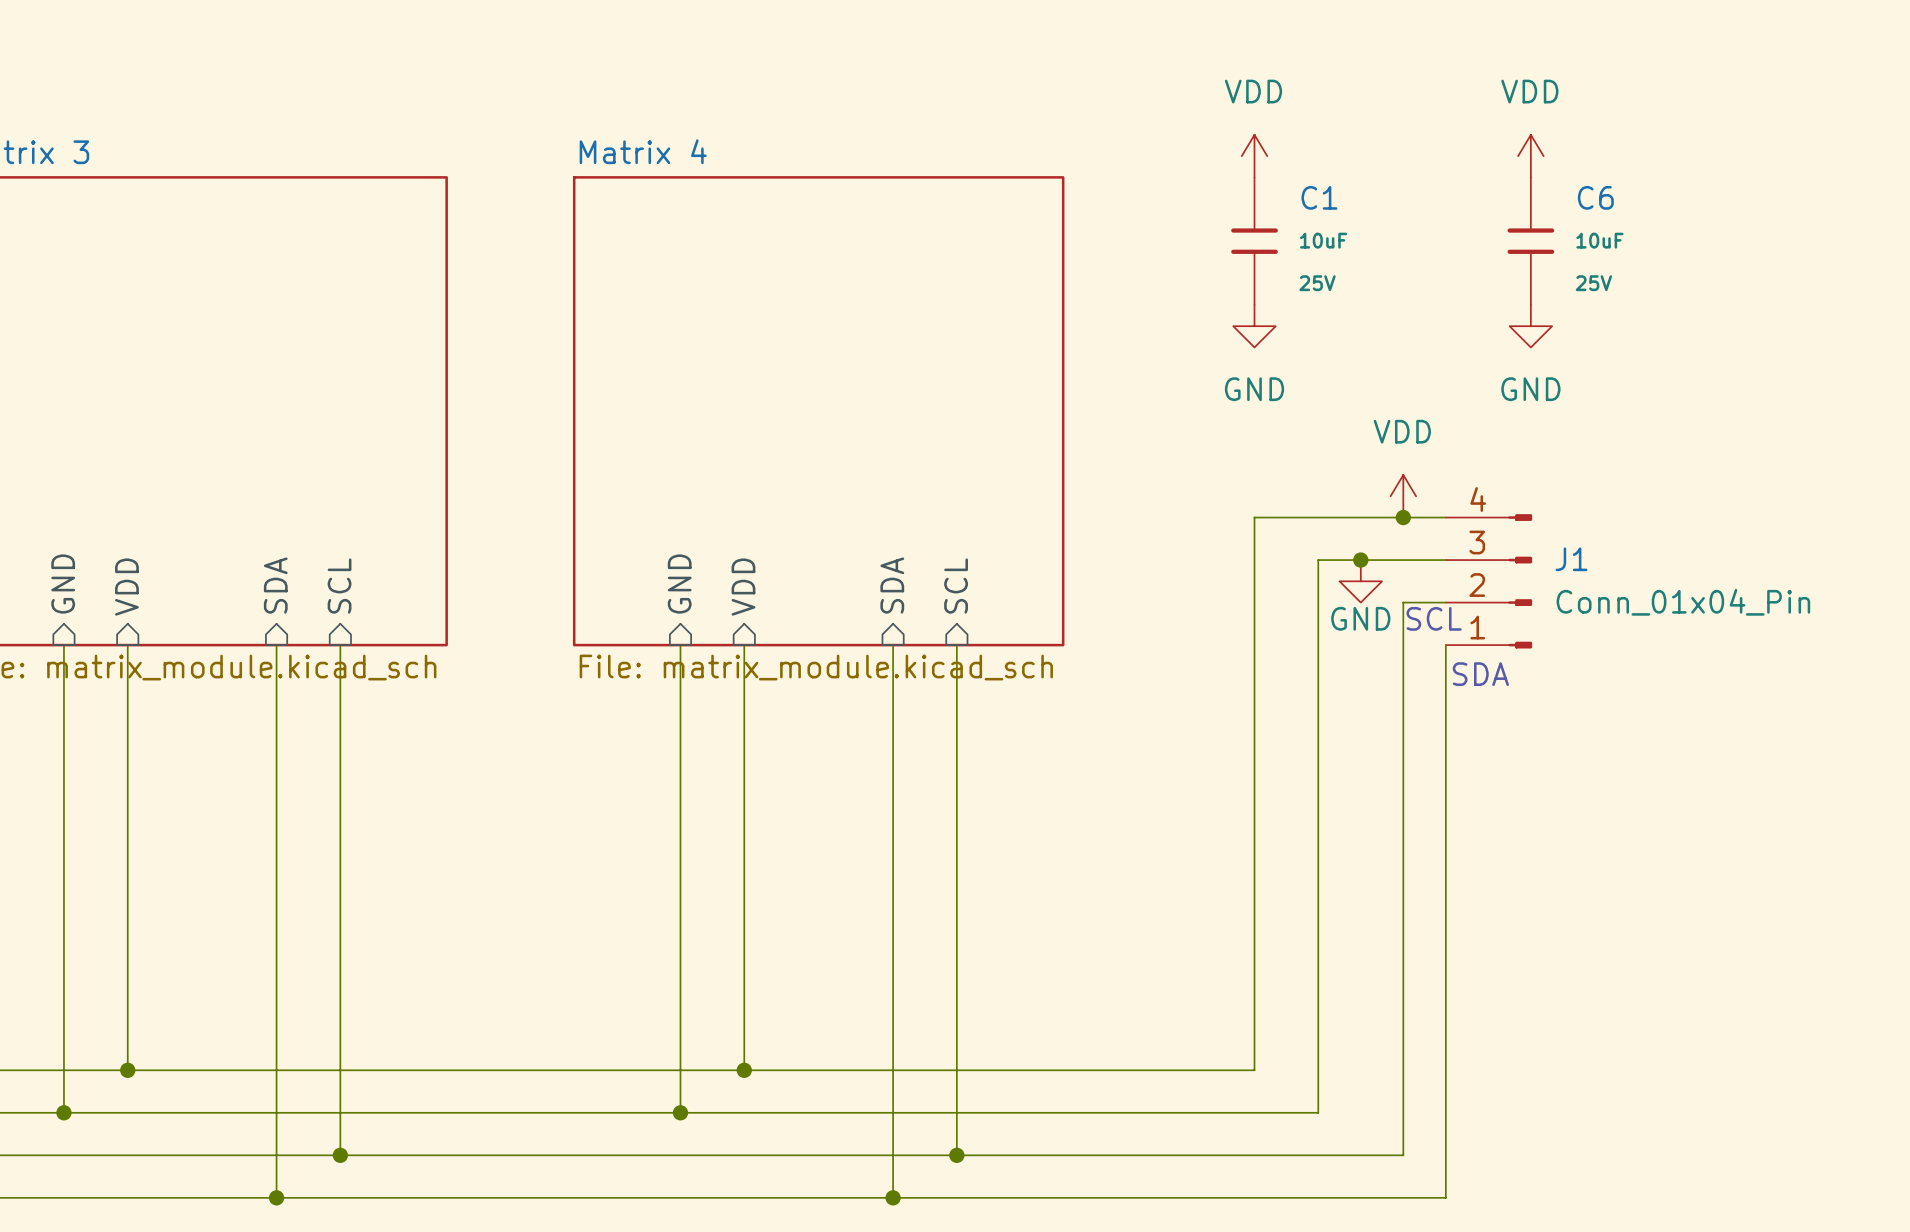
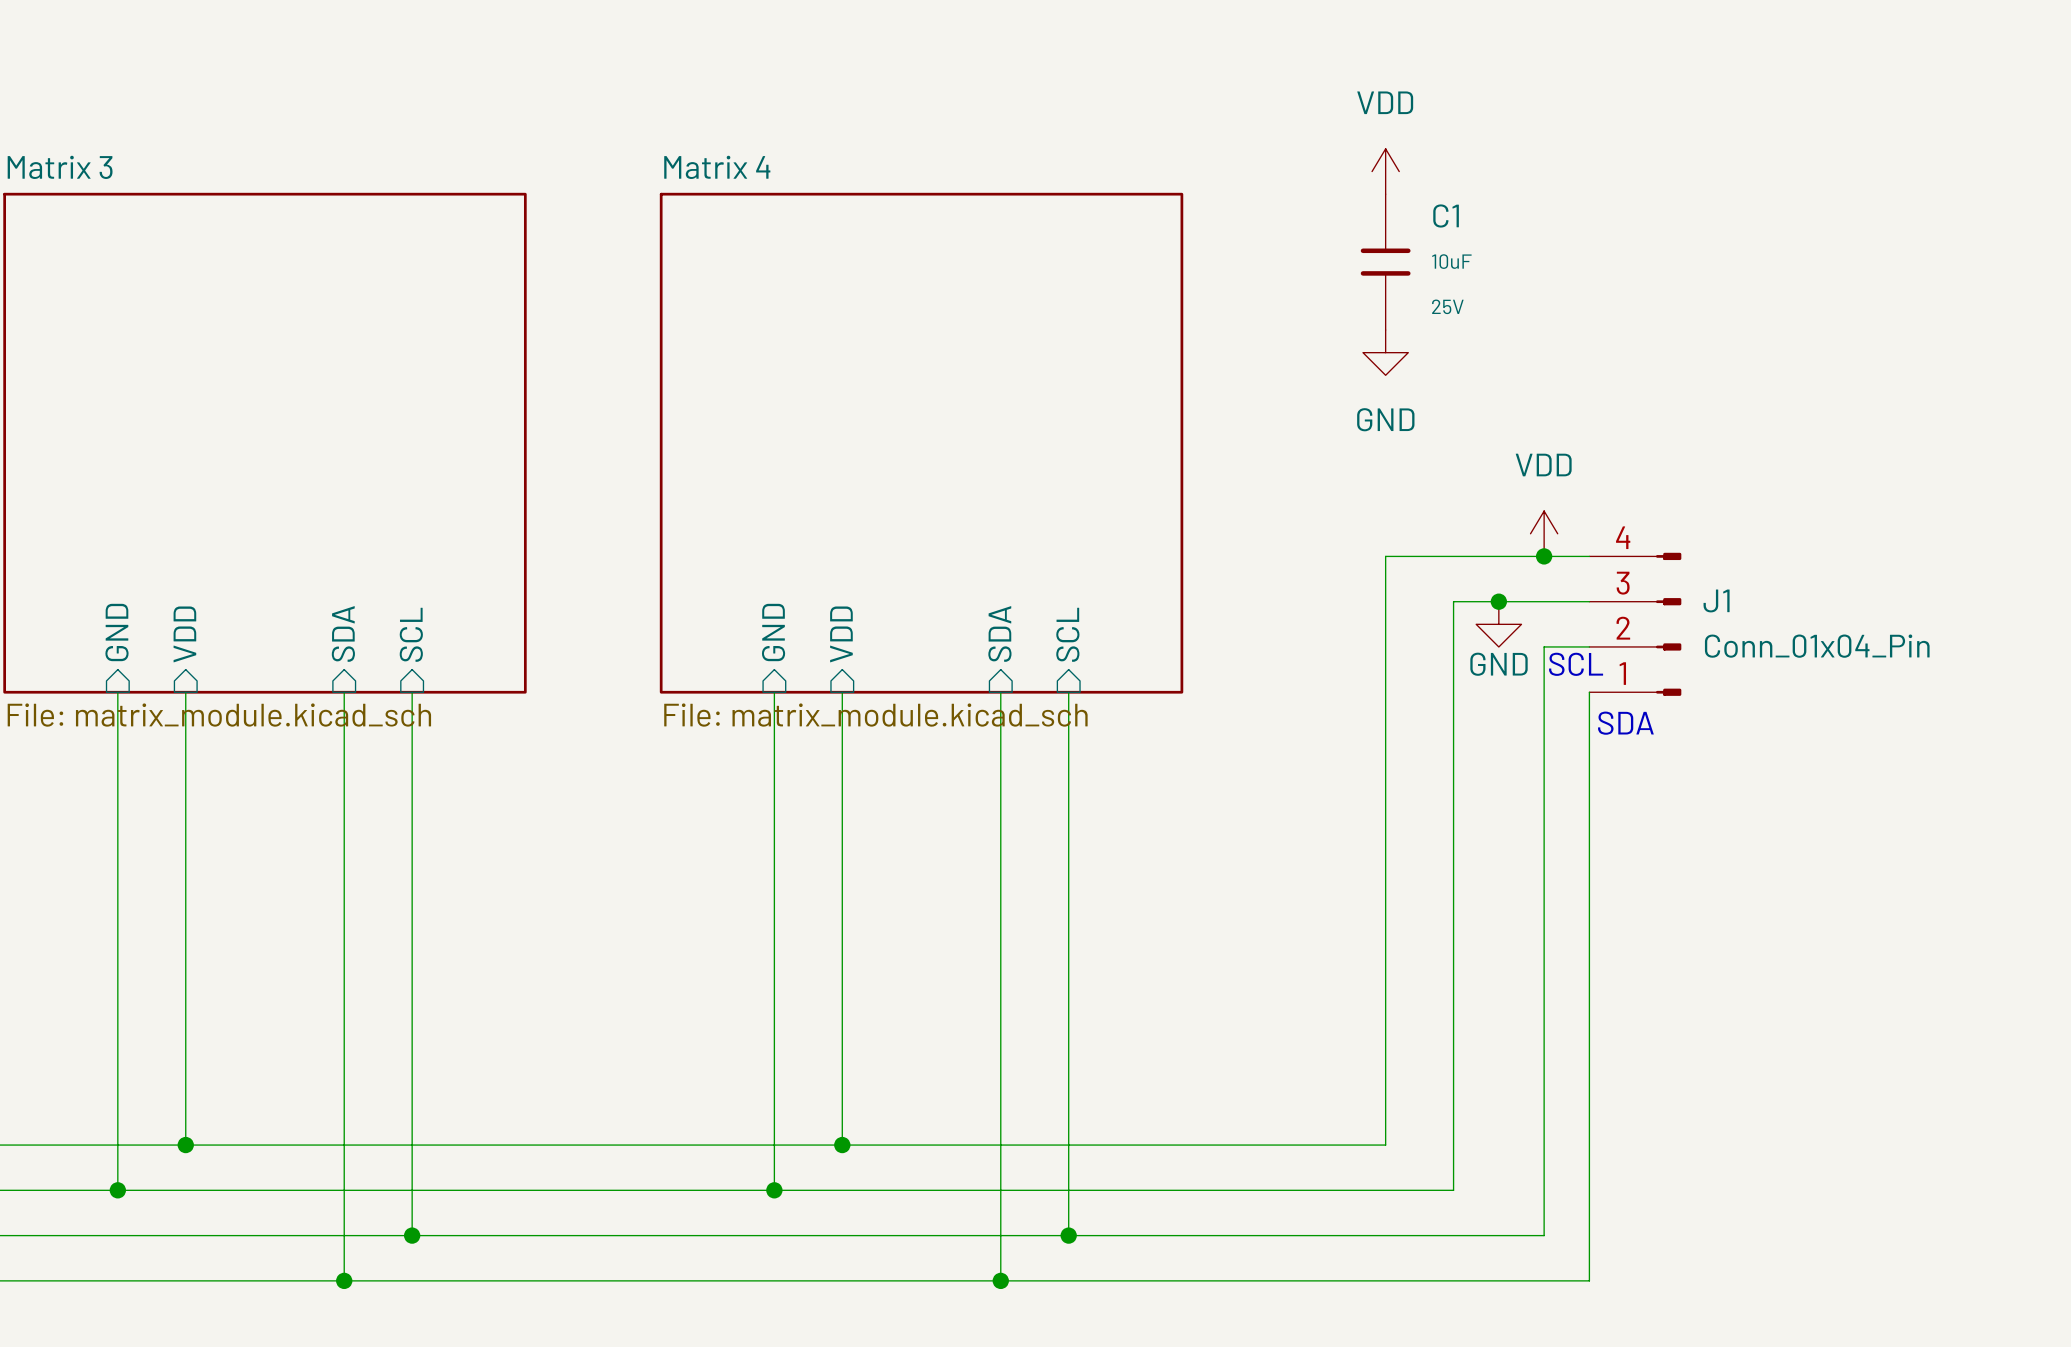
power symbol: VDD (1530, 156) -> none
C6: 10uF (1530, 241) -> none
power symbol: GND (1530, 326) -> none

